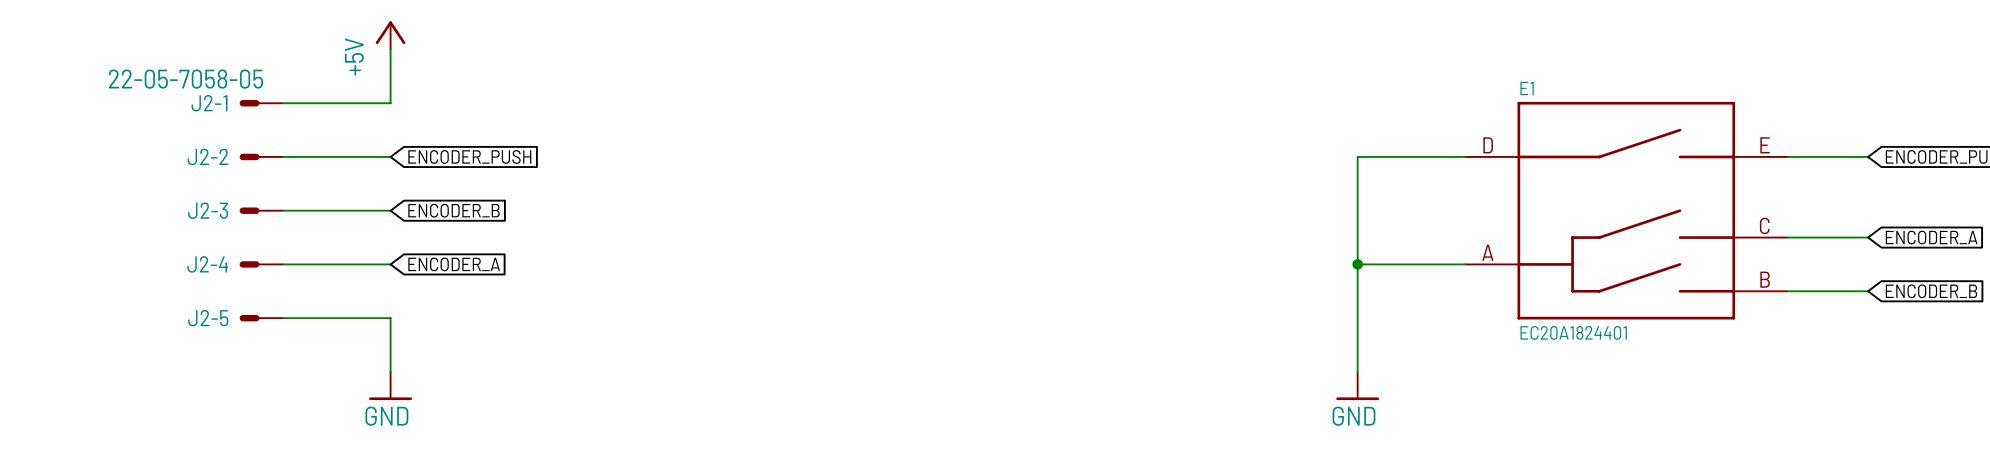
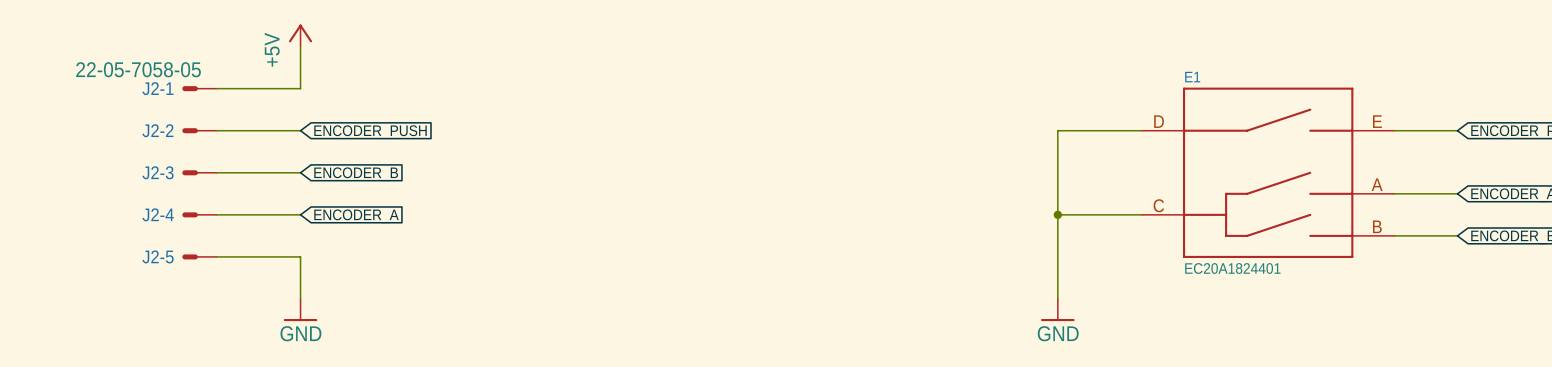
E1 pin number: C (1764, 225) -> A (1377, 184)
E1 pin number: A (1487, 252) -> C (1158, 205)

